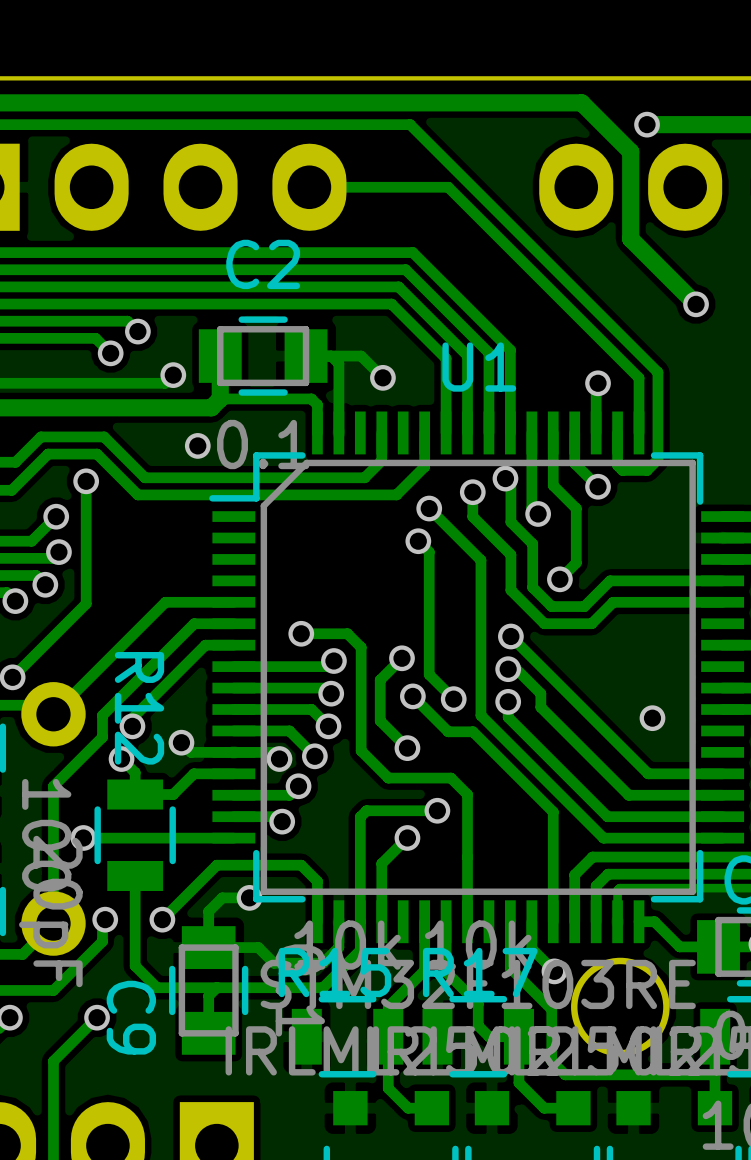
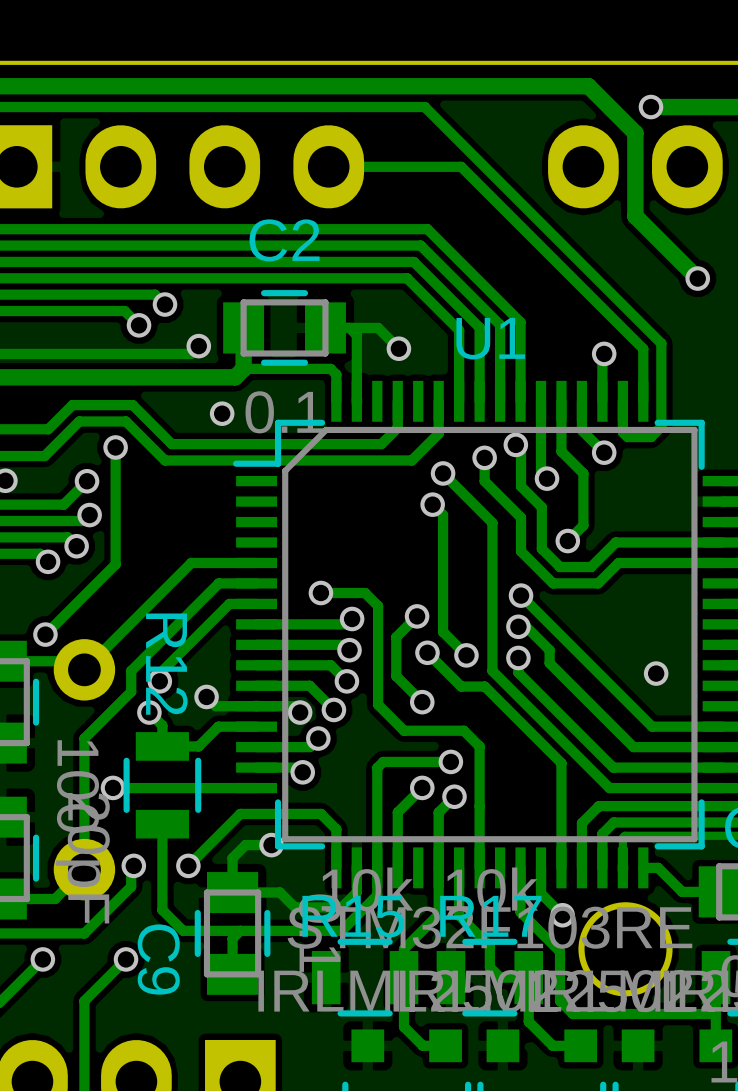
track: none -> (454, 796) (438, 812) (438, 867)
via: none -> (454, 796)

